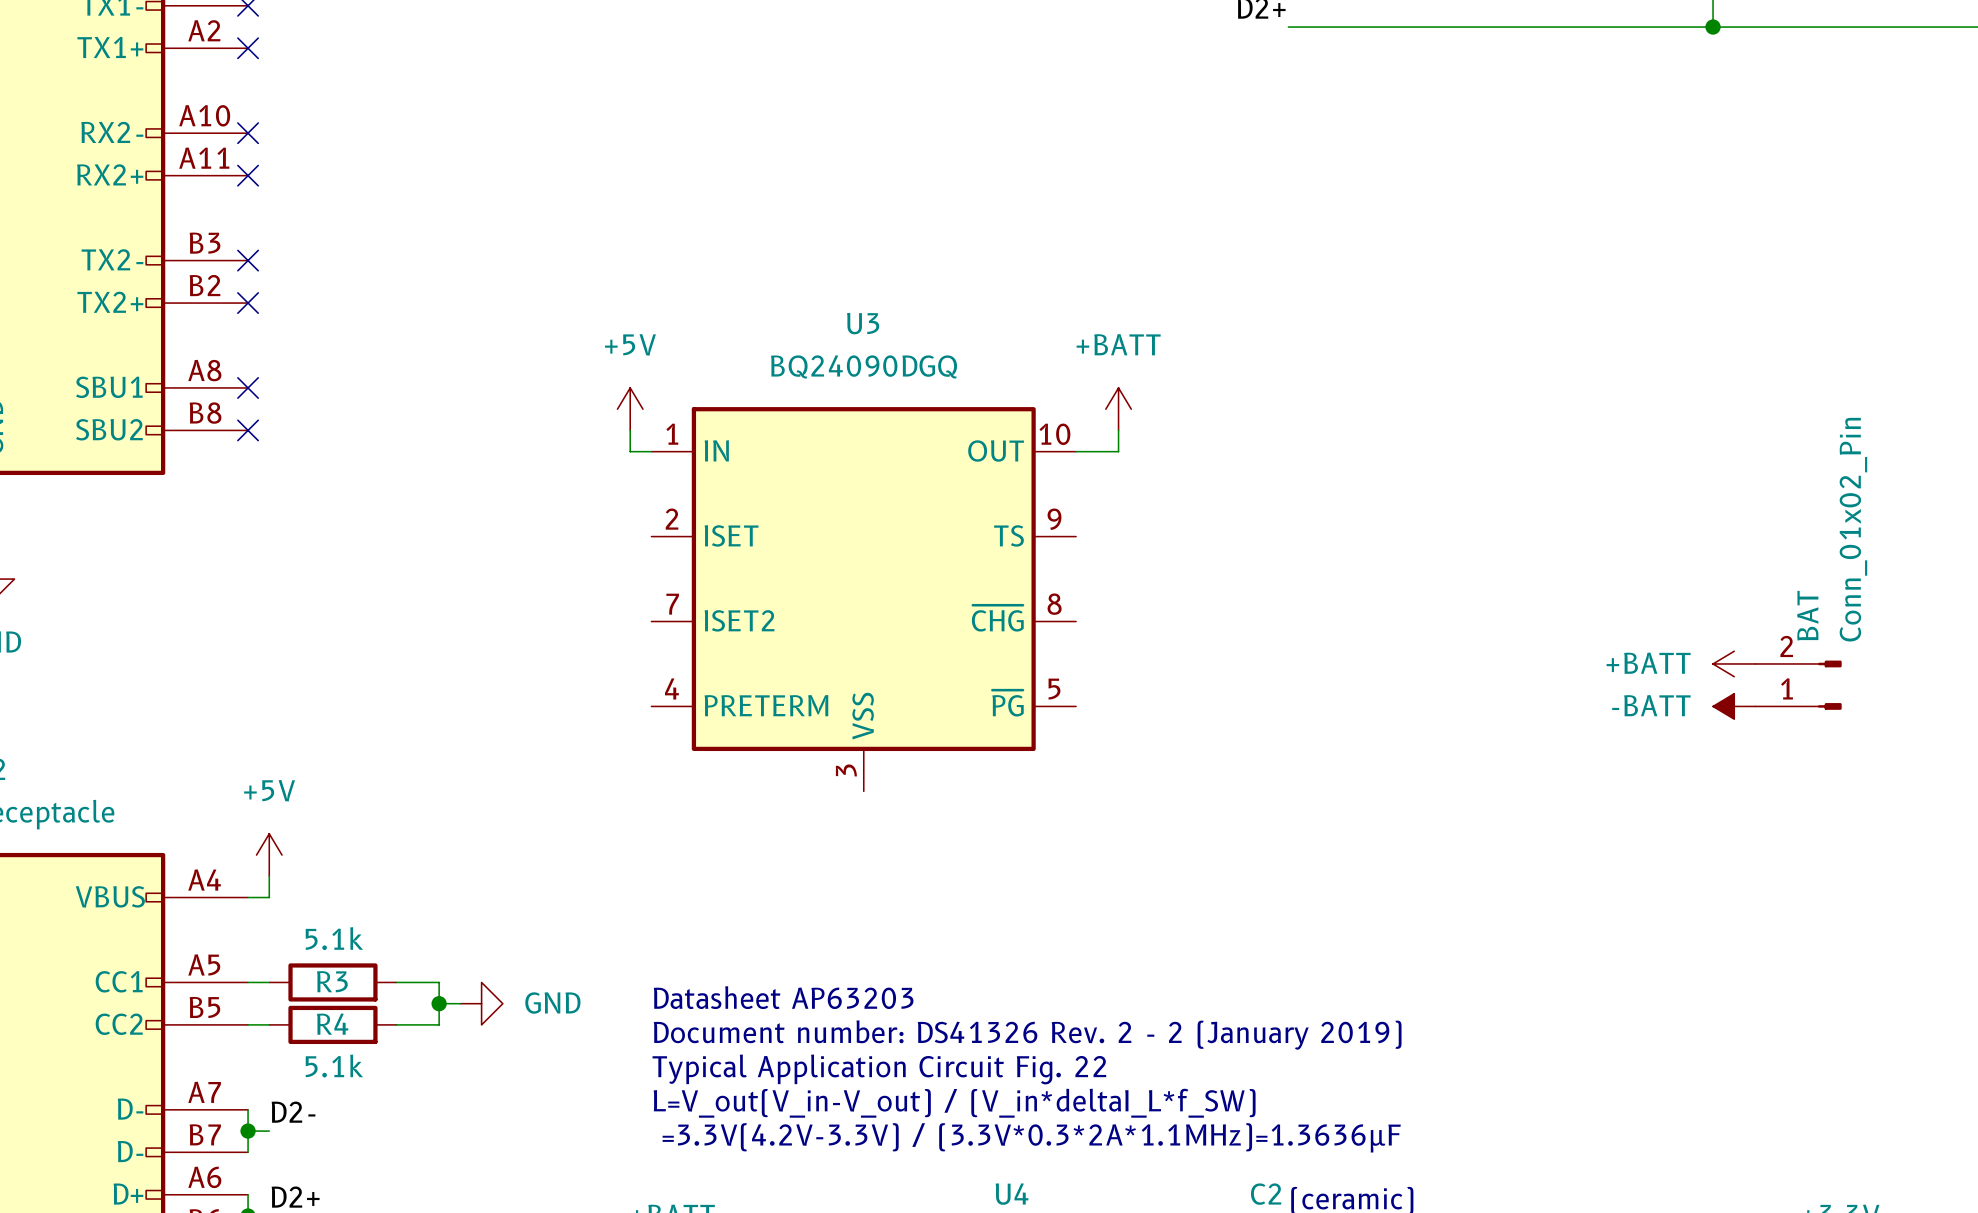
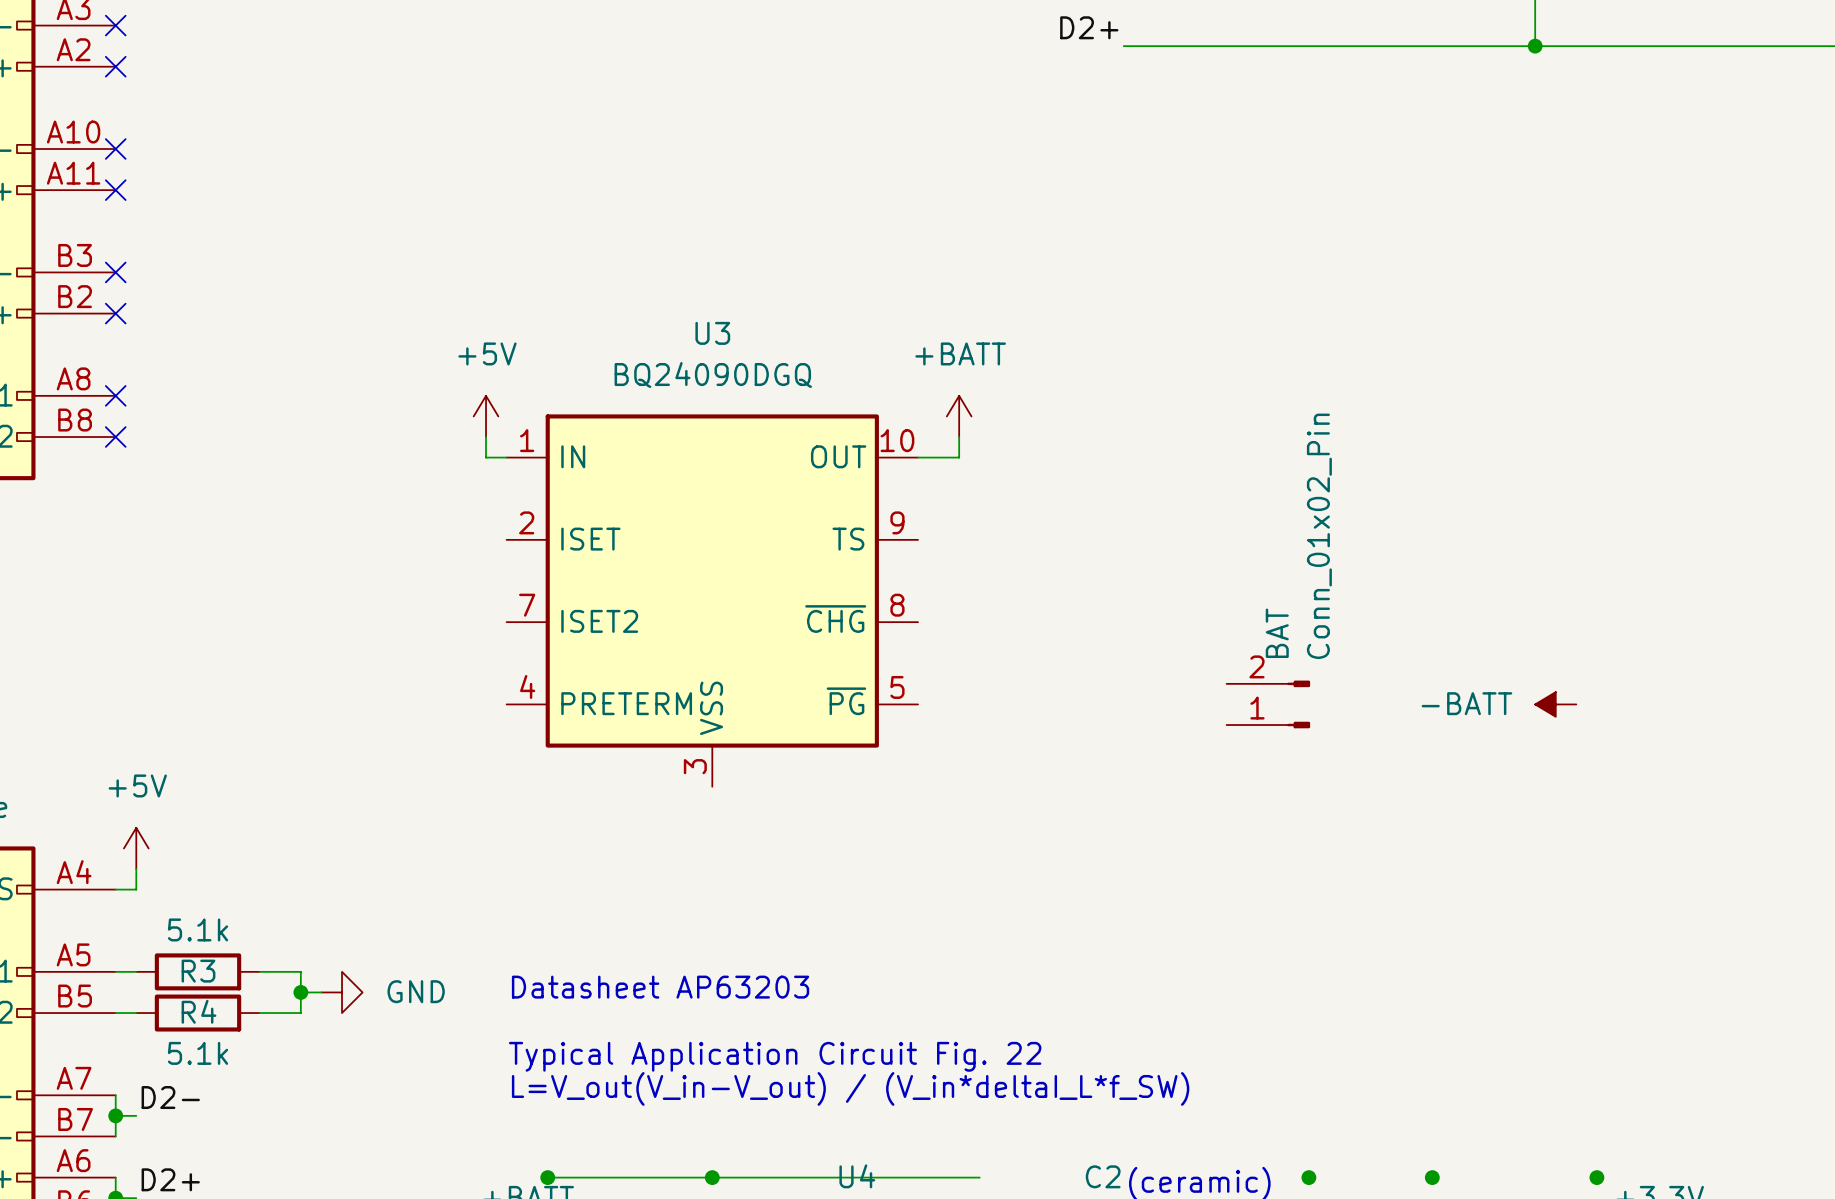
power symbol: +BATT (1734, 663) -> none
BAT position: (1798, 685) -> (1268, 704)
text: Document number: DS41326 Rev. 2 - 2 (January 2019) (1027, 1035) -> none
text: =3.3V(4.2V-3.3V) / (3.3V*0.3*2A*1.1MHz)=1.3636µF (1031, 1137) -> none
wire: none -> (547, 1177) (979, 1177)
junction: none -> (547, 1177)
junction: none -> (712, 1177)
junction: none -> (1308, 1177)
junction: none -> (1432, 1177)
junction: none -> (1596, 1177)

